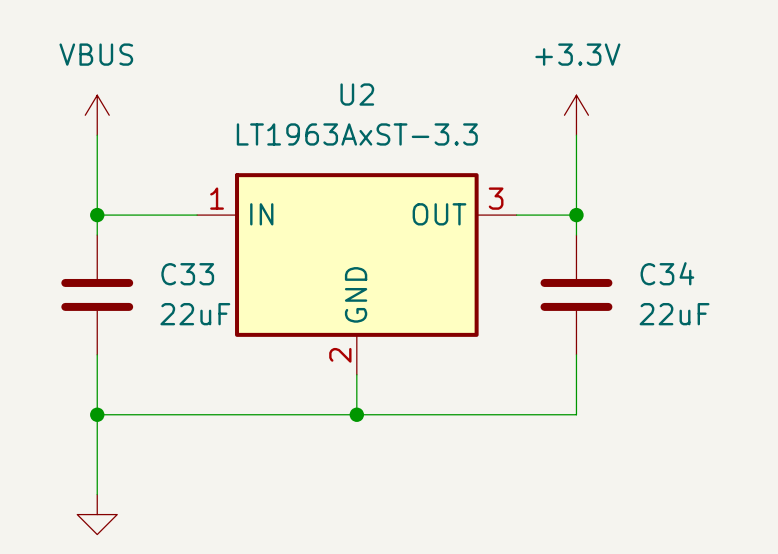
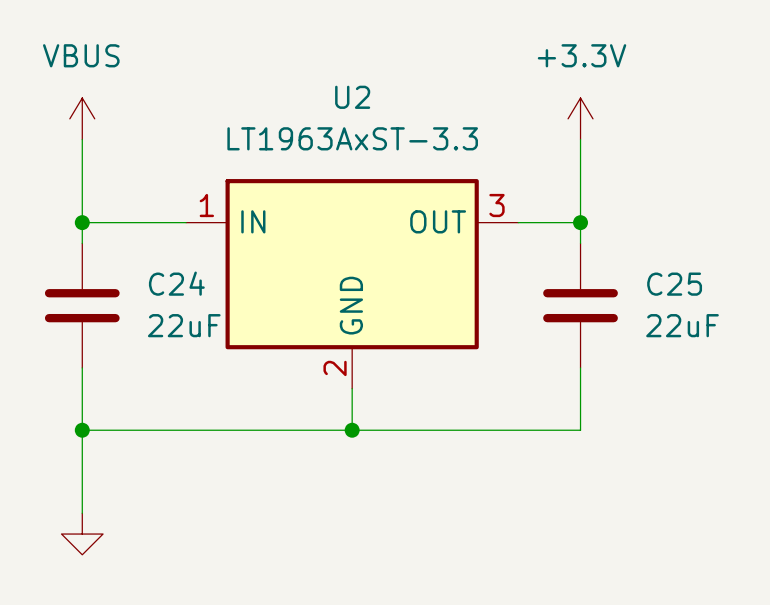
C34 name: C34 (667, 273) -> C25 (674, 284)
C33 name: C33 (187, 274) -> C24 (176, 283)

